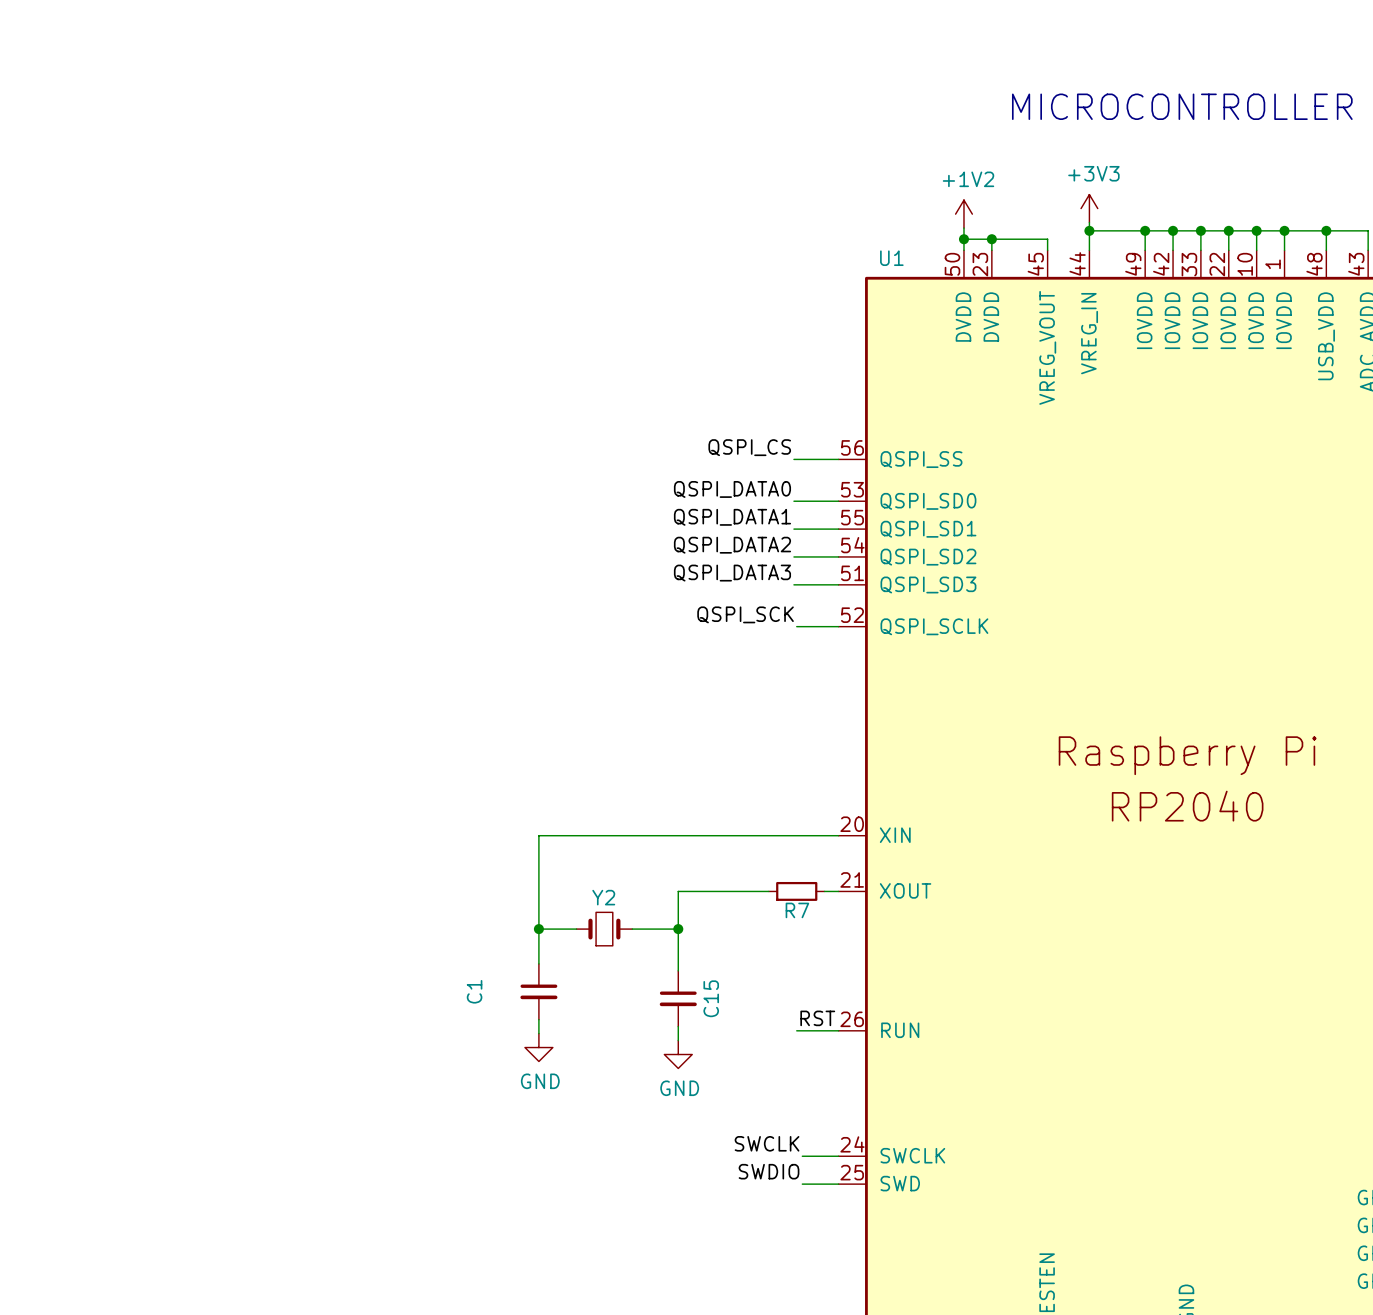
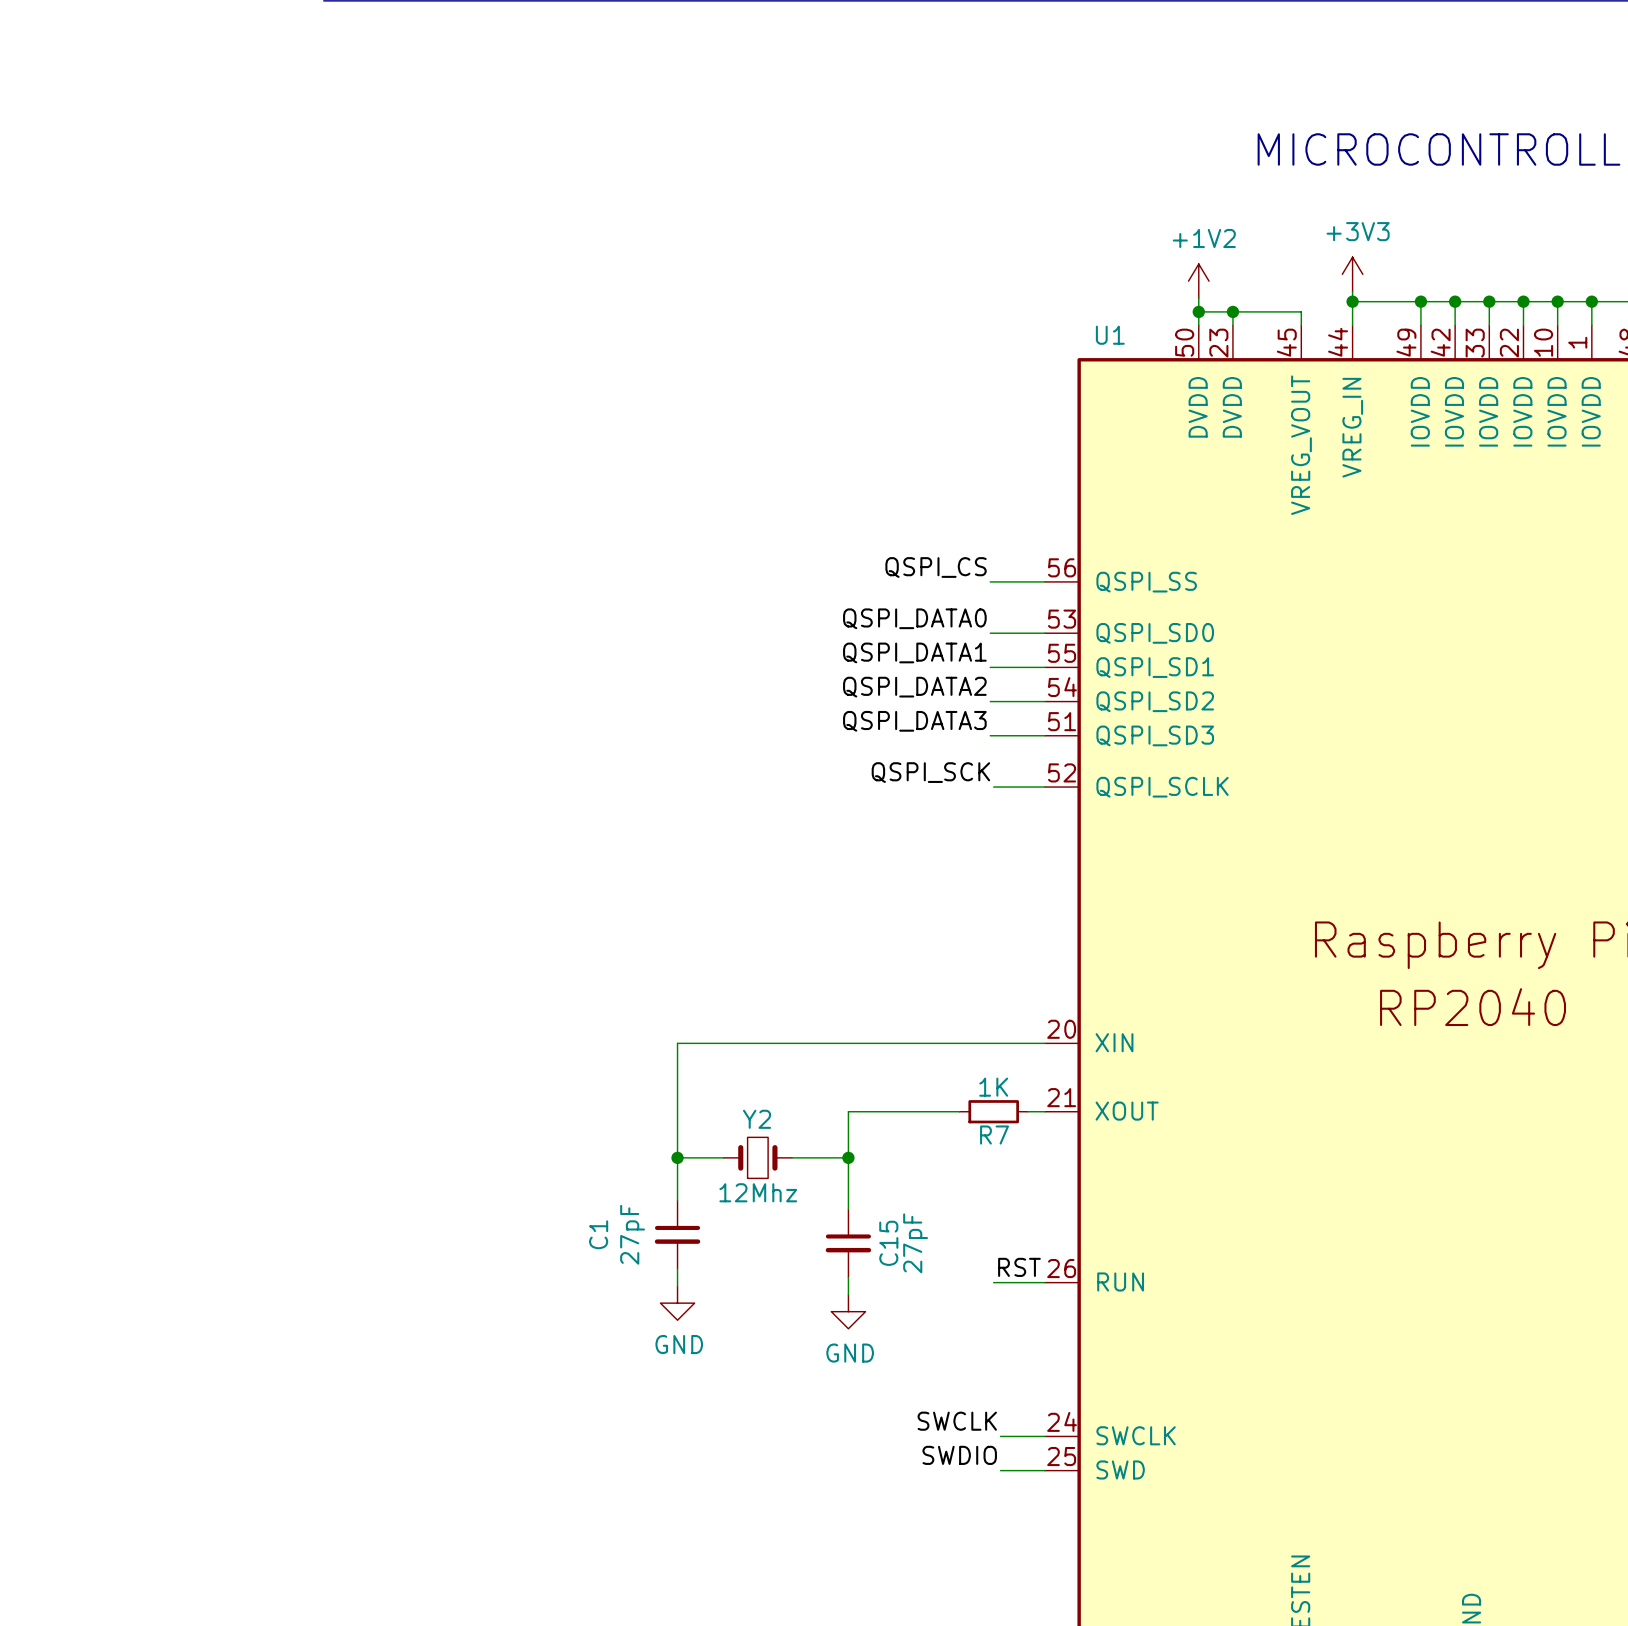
R7 value: none -> 1K (993, 1087)
Y2 value: none -> 12Mhz (758, 1192)
C1 value: none -> 27pF (632, 1234)
C15 value: none -> 27pF (915, 1243)

